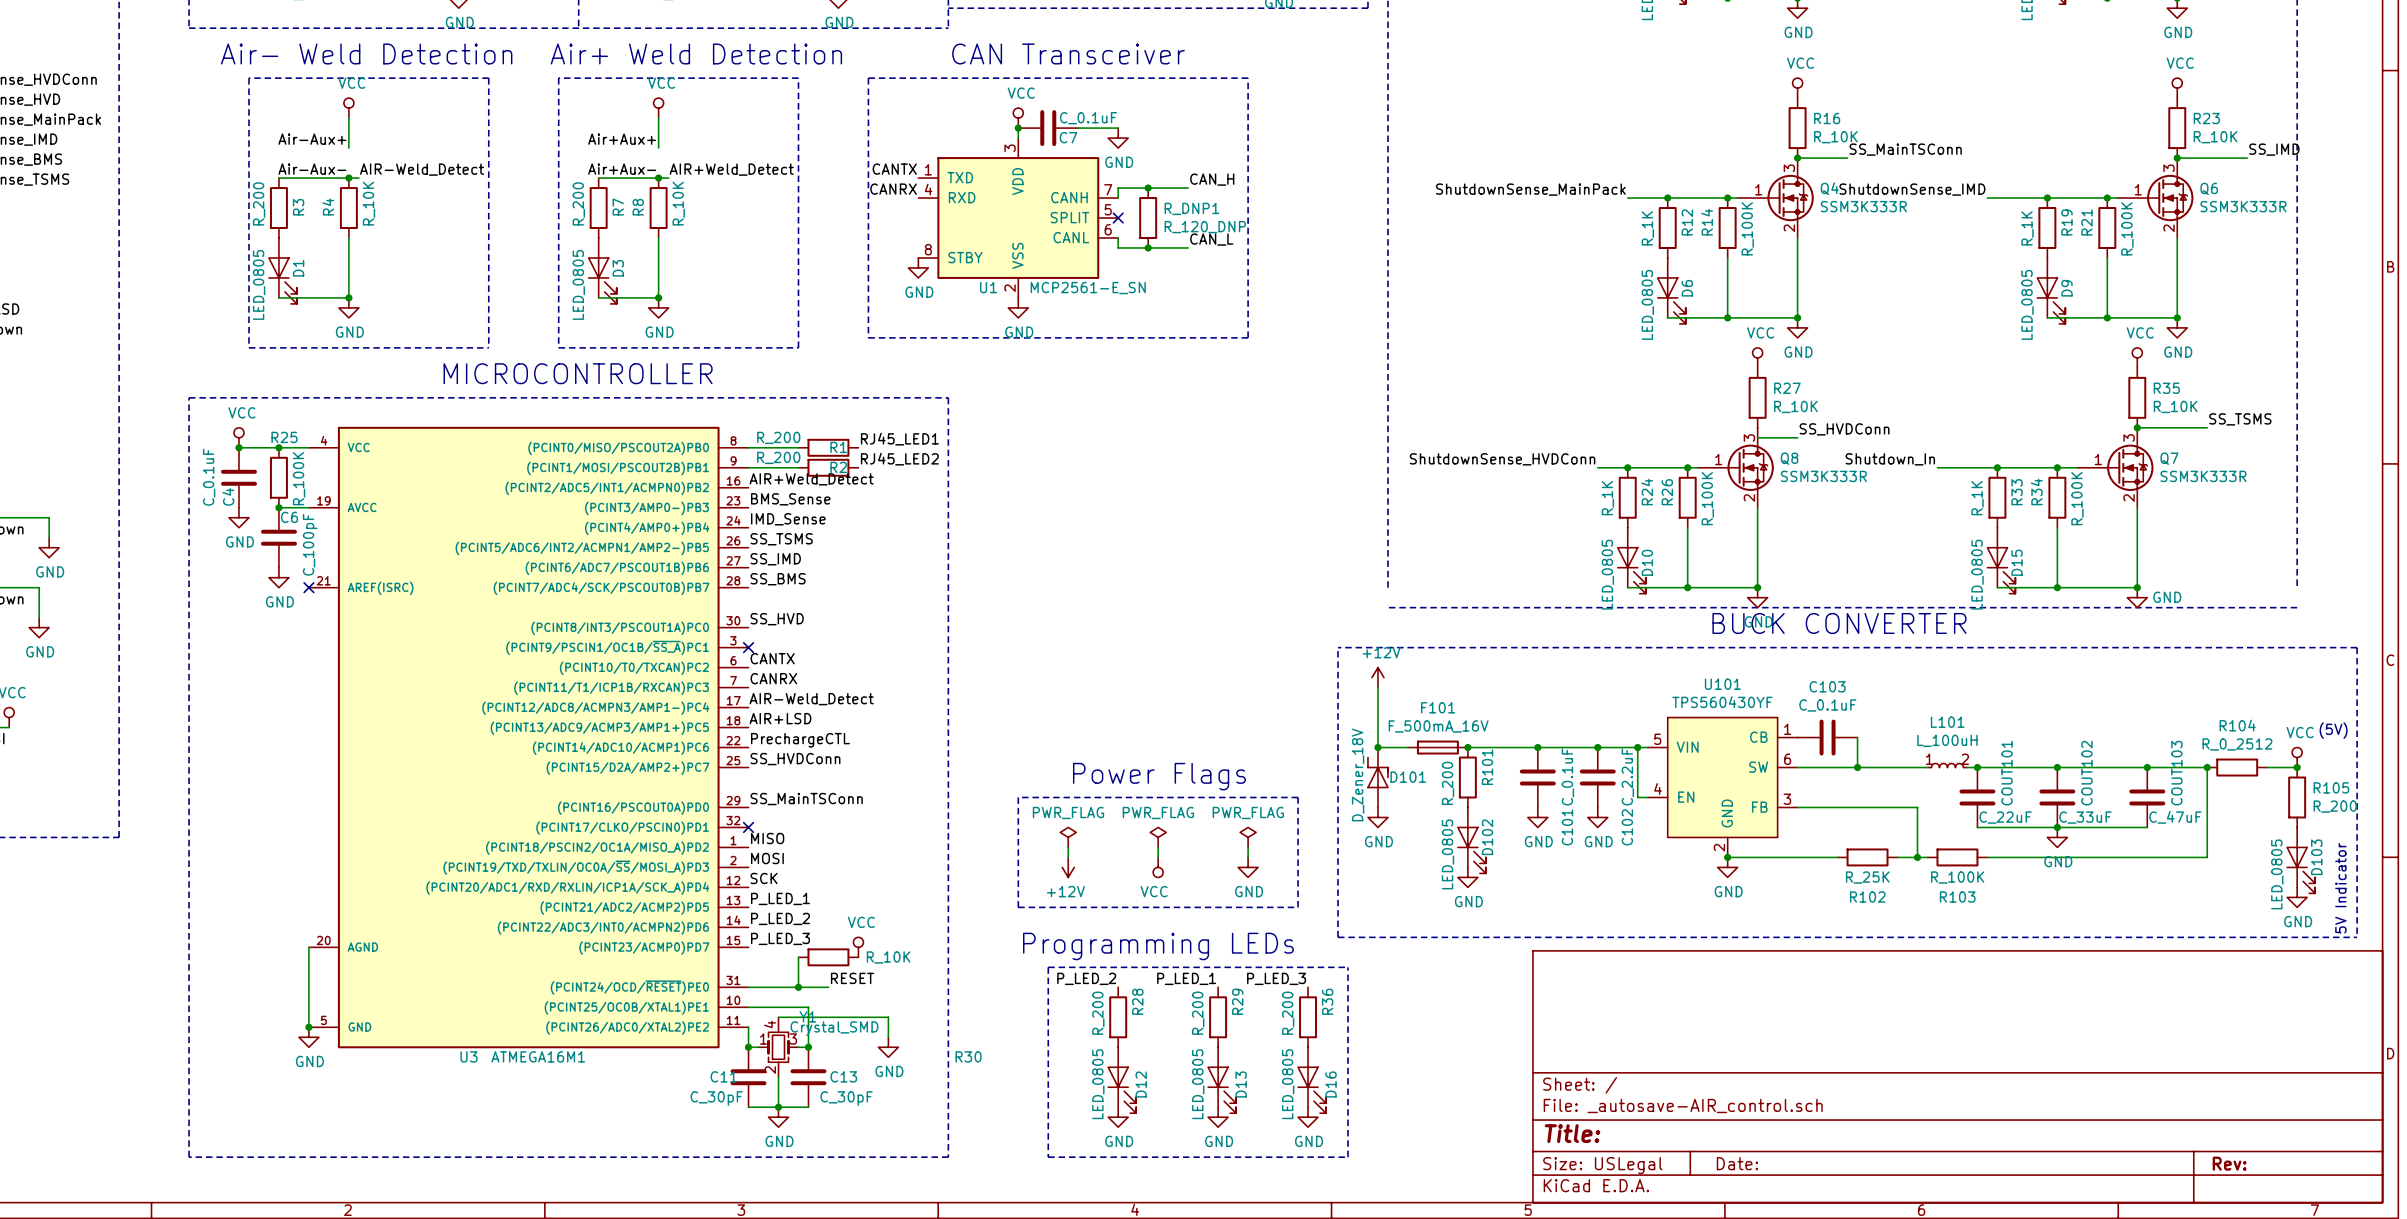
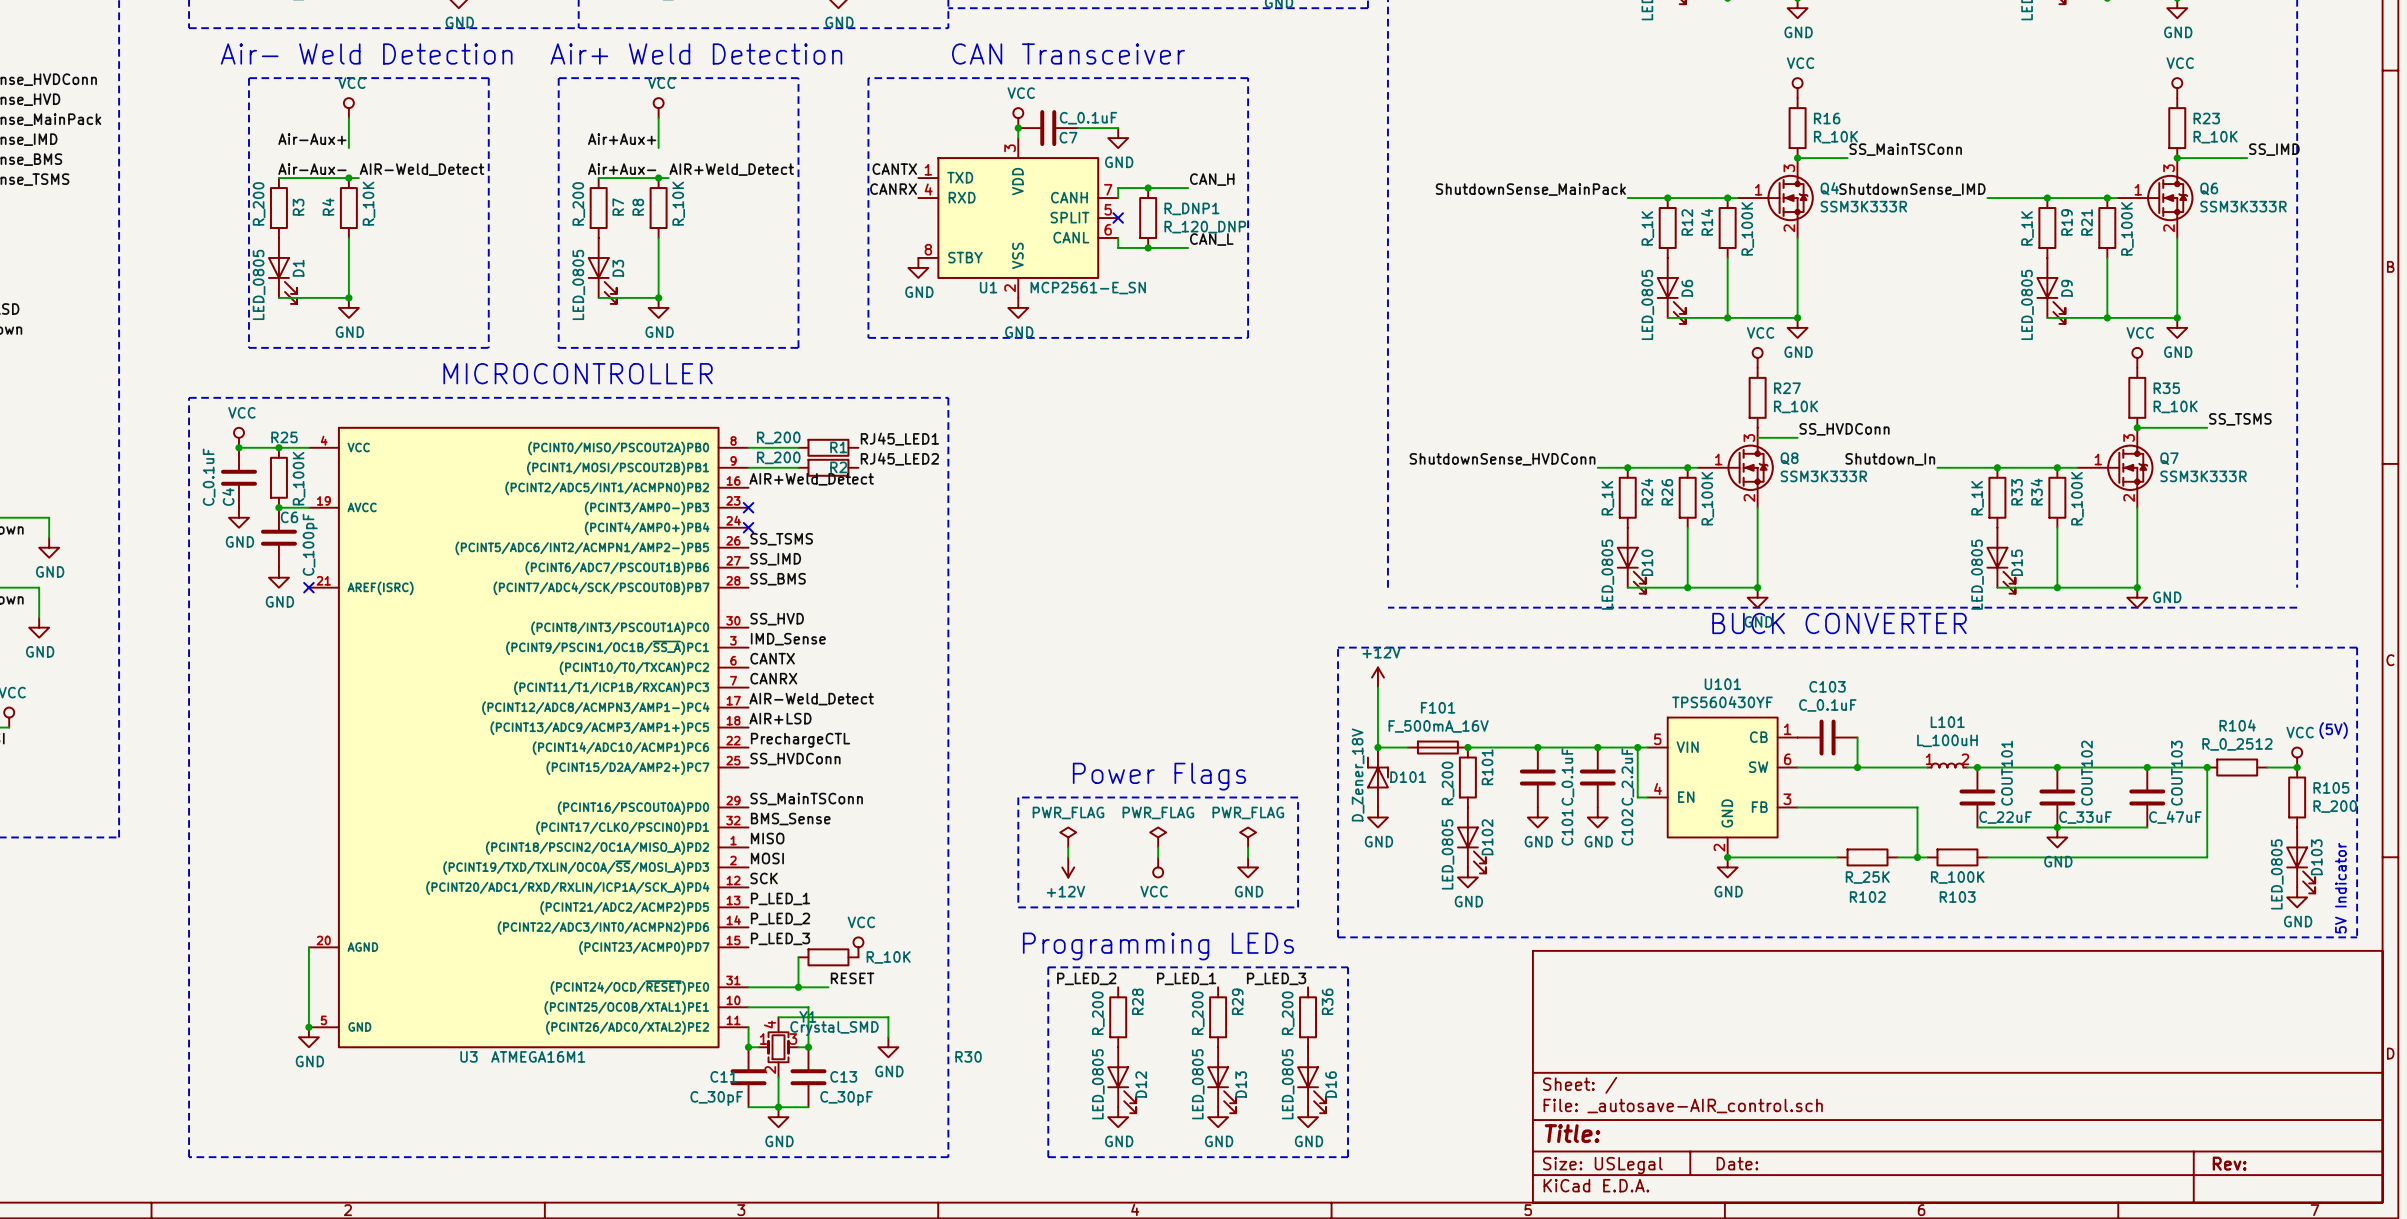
label: BMS_Sense (790, 499) -> none
no-connect mark: none -> (748, 507)
label position: IMD_Sense (788, 519) -> IMD_Sense (788, 639)
no-connect mark: none -> (748, 527)
no-connect mark: (748, 647) -> none
label: none -> BMS_Sense (790, 819)
no-connect mark: (748, 827) -> none

